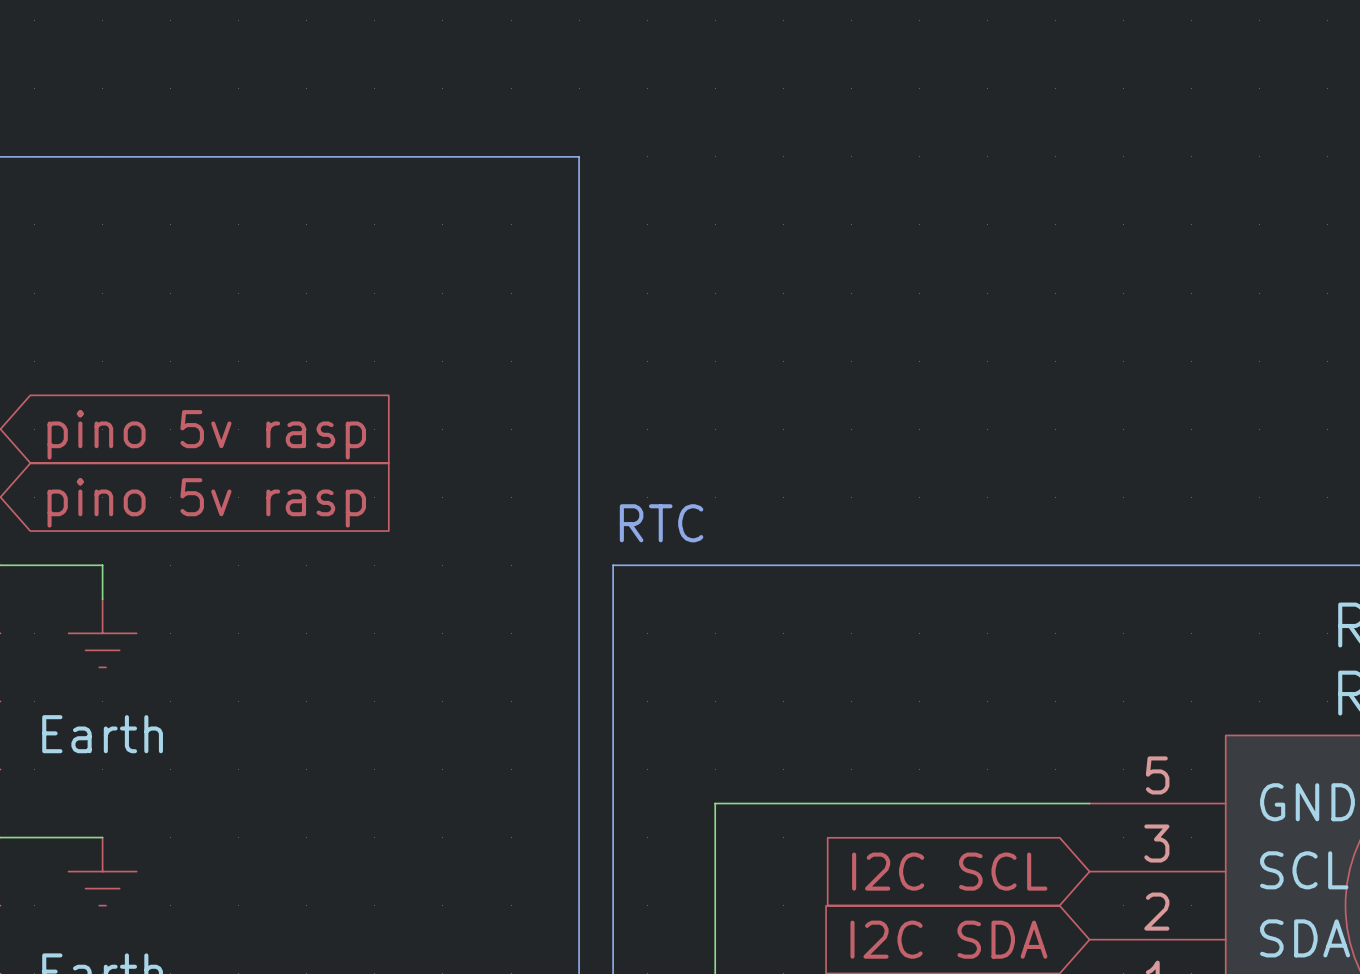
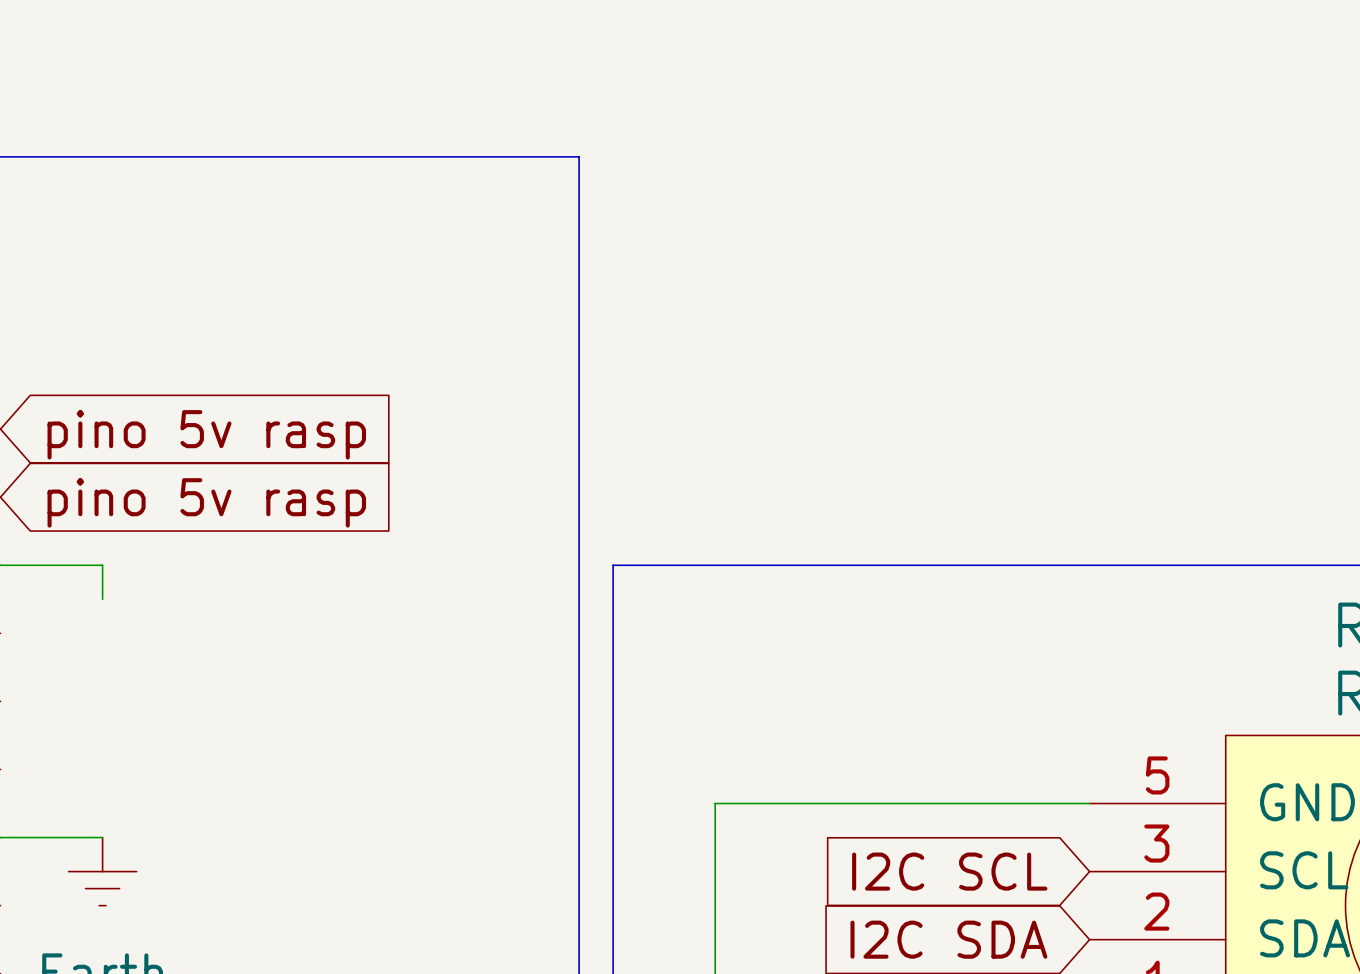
text: RTC (661, 523) -> none
power symbol: Earth (102, 633) -> none

